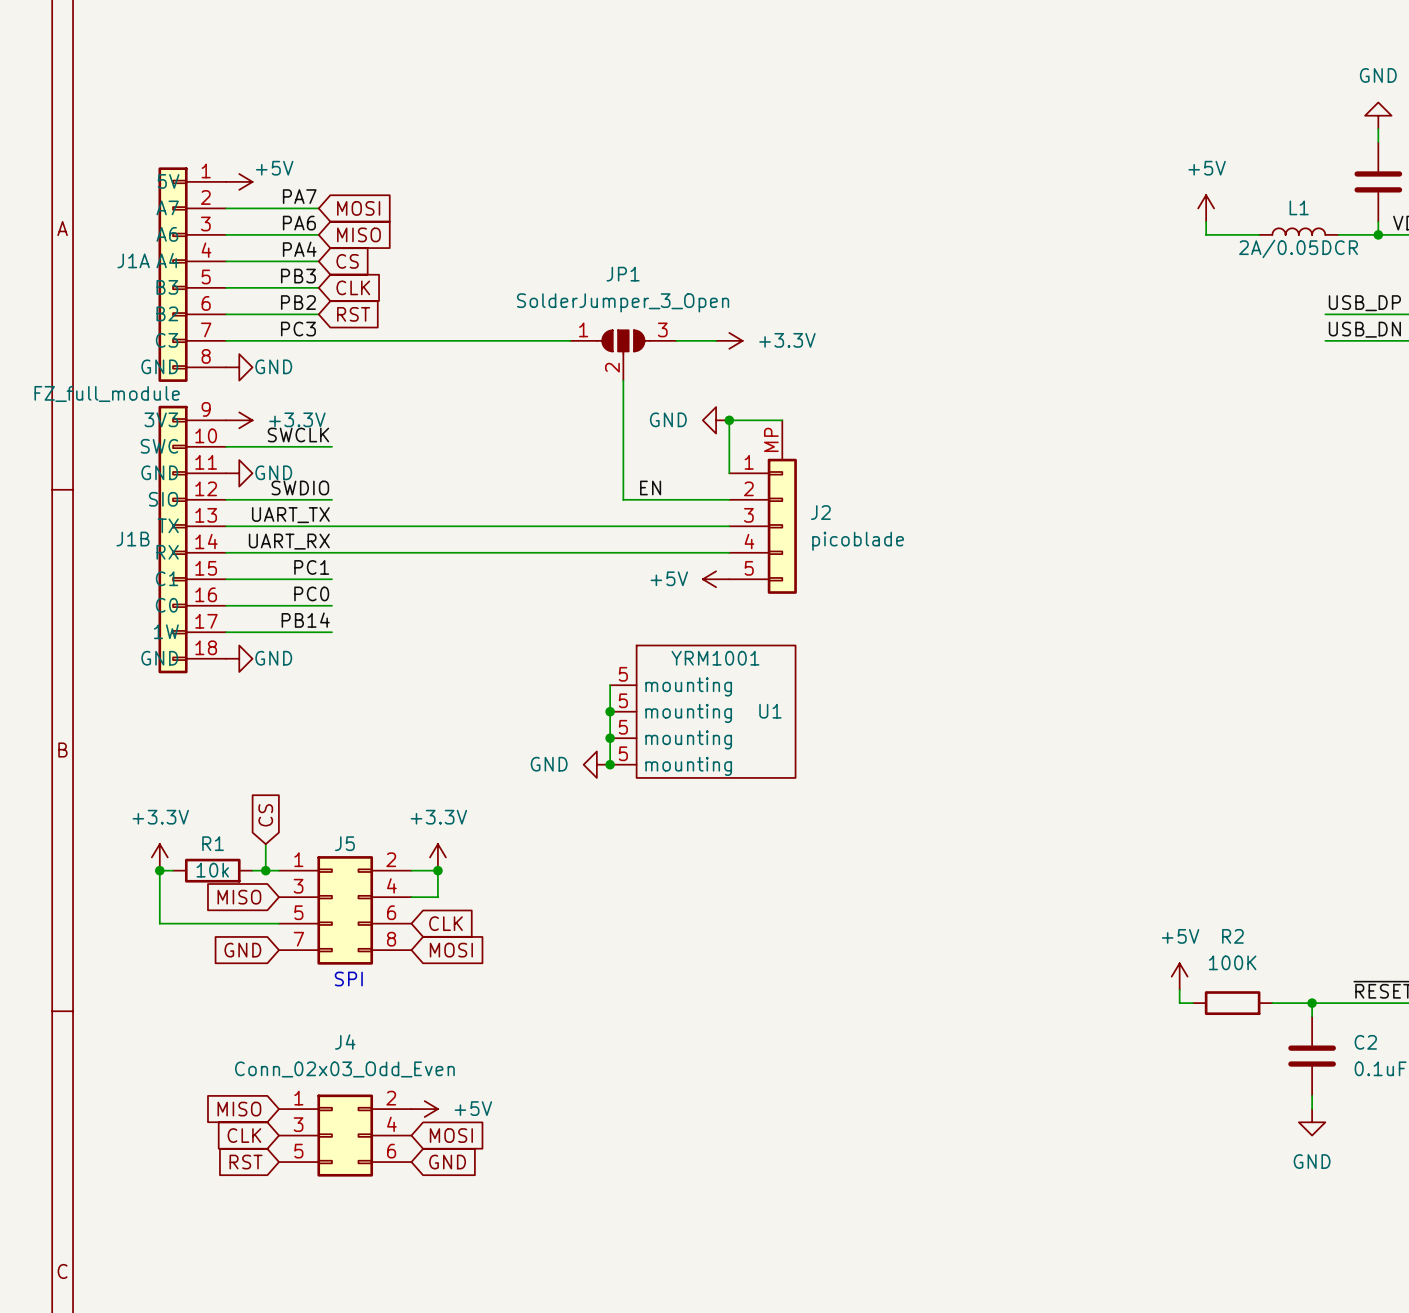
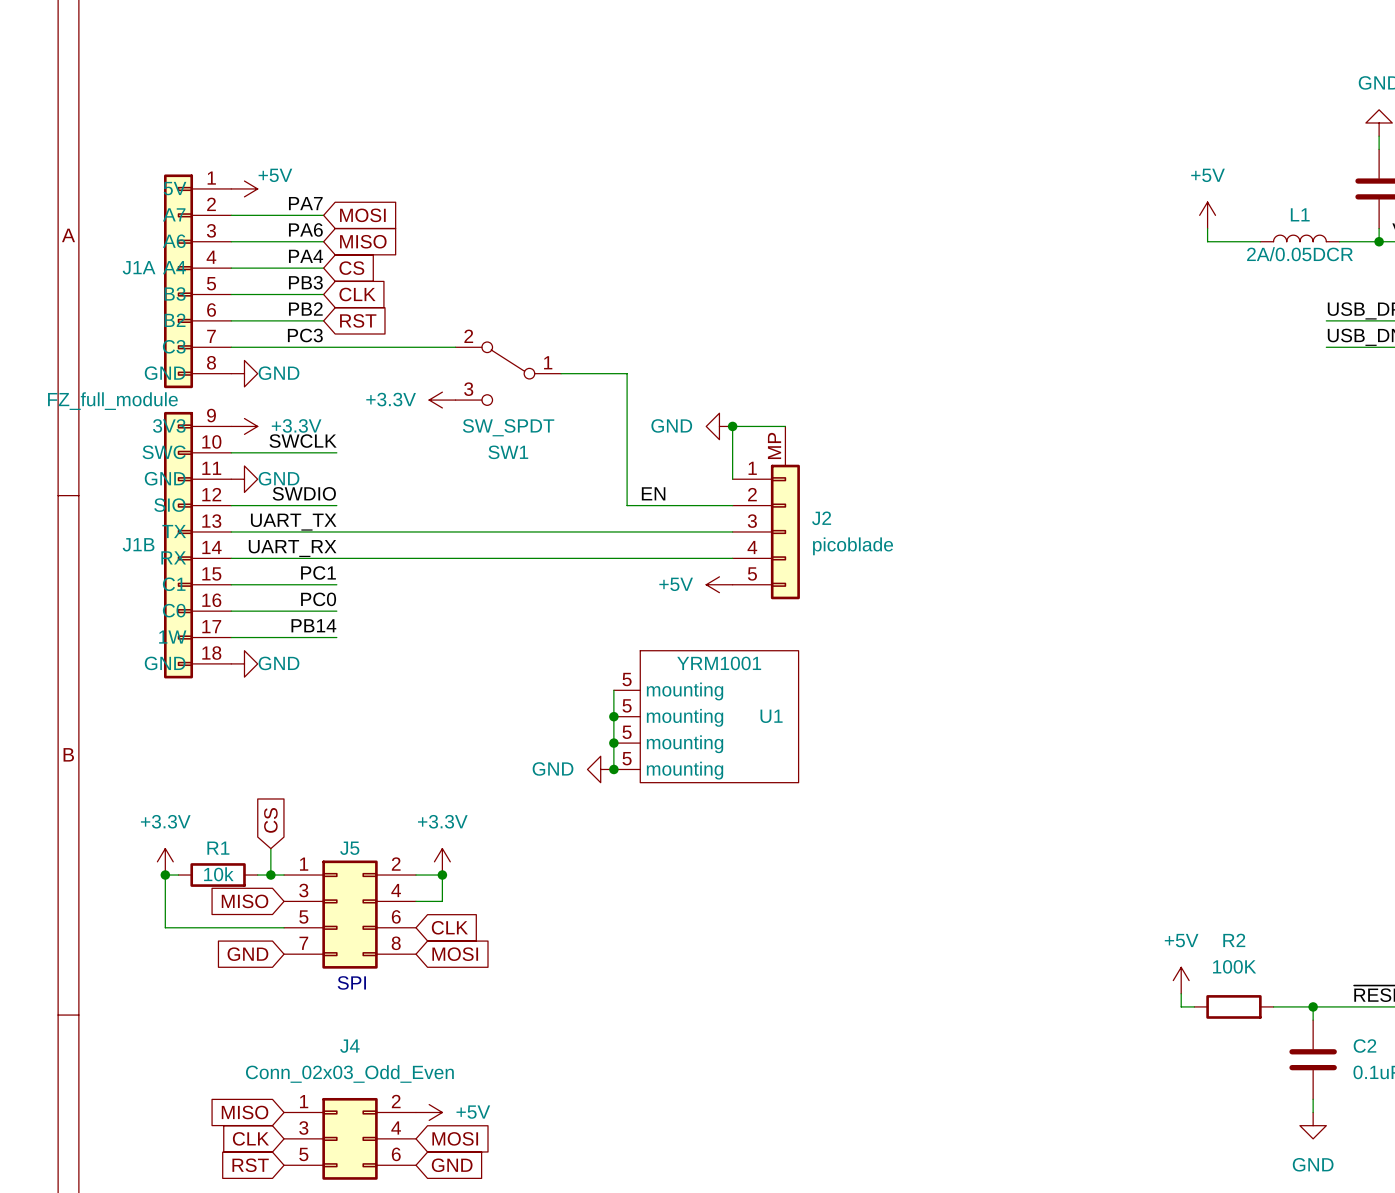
wire: (451, 340) (570, 340) -> none
wire: (676, 340) (716, 340) -> none
power symbol: +3.3V (729, 340) -> none
JP1: SolderJumper_3_Open (623, 355) -> none
SW1: none -> SW_SPDT (508, 373)
wire: none -> (561, 373) (627, 373) (627, 386)
power symbol: none -> +3.3V (442, 400)

